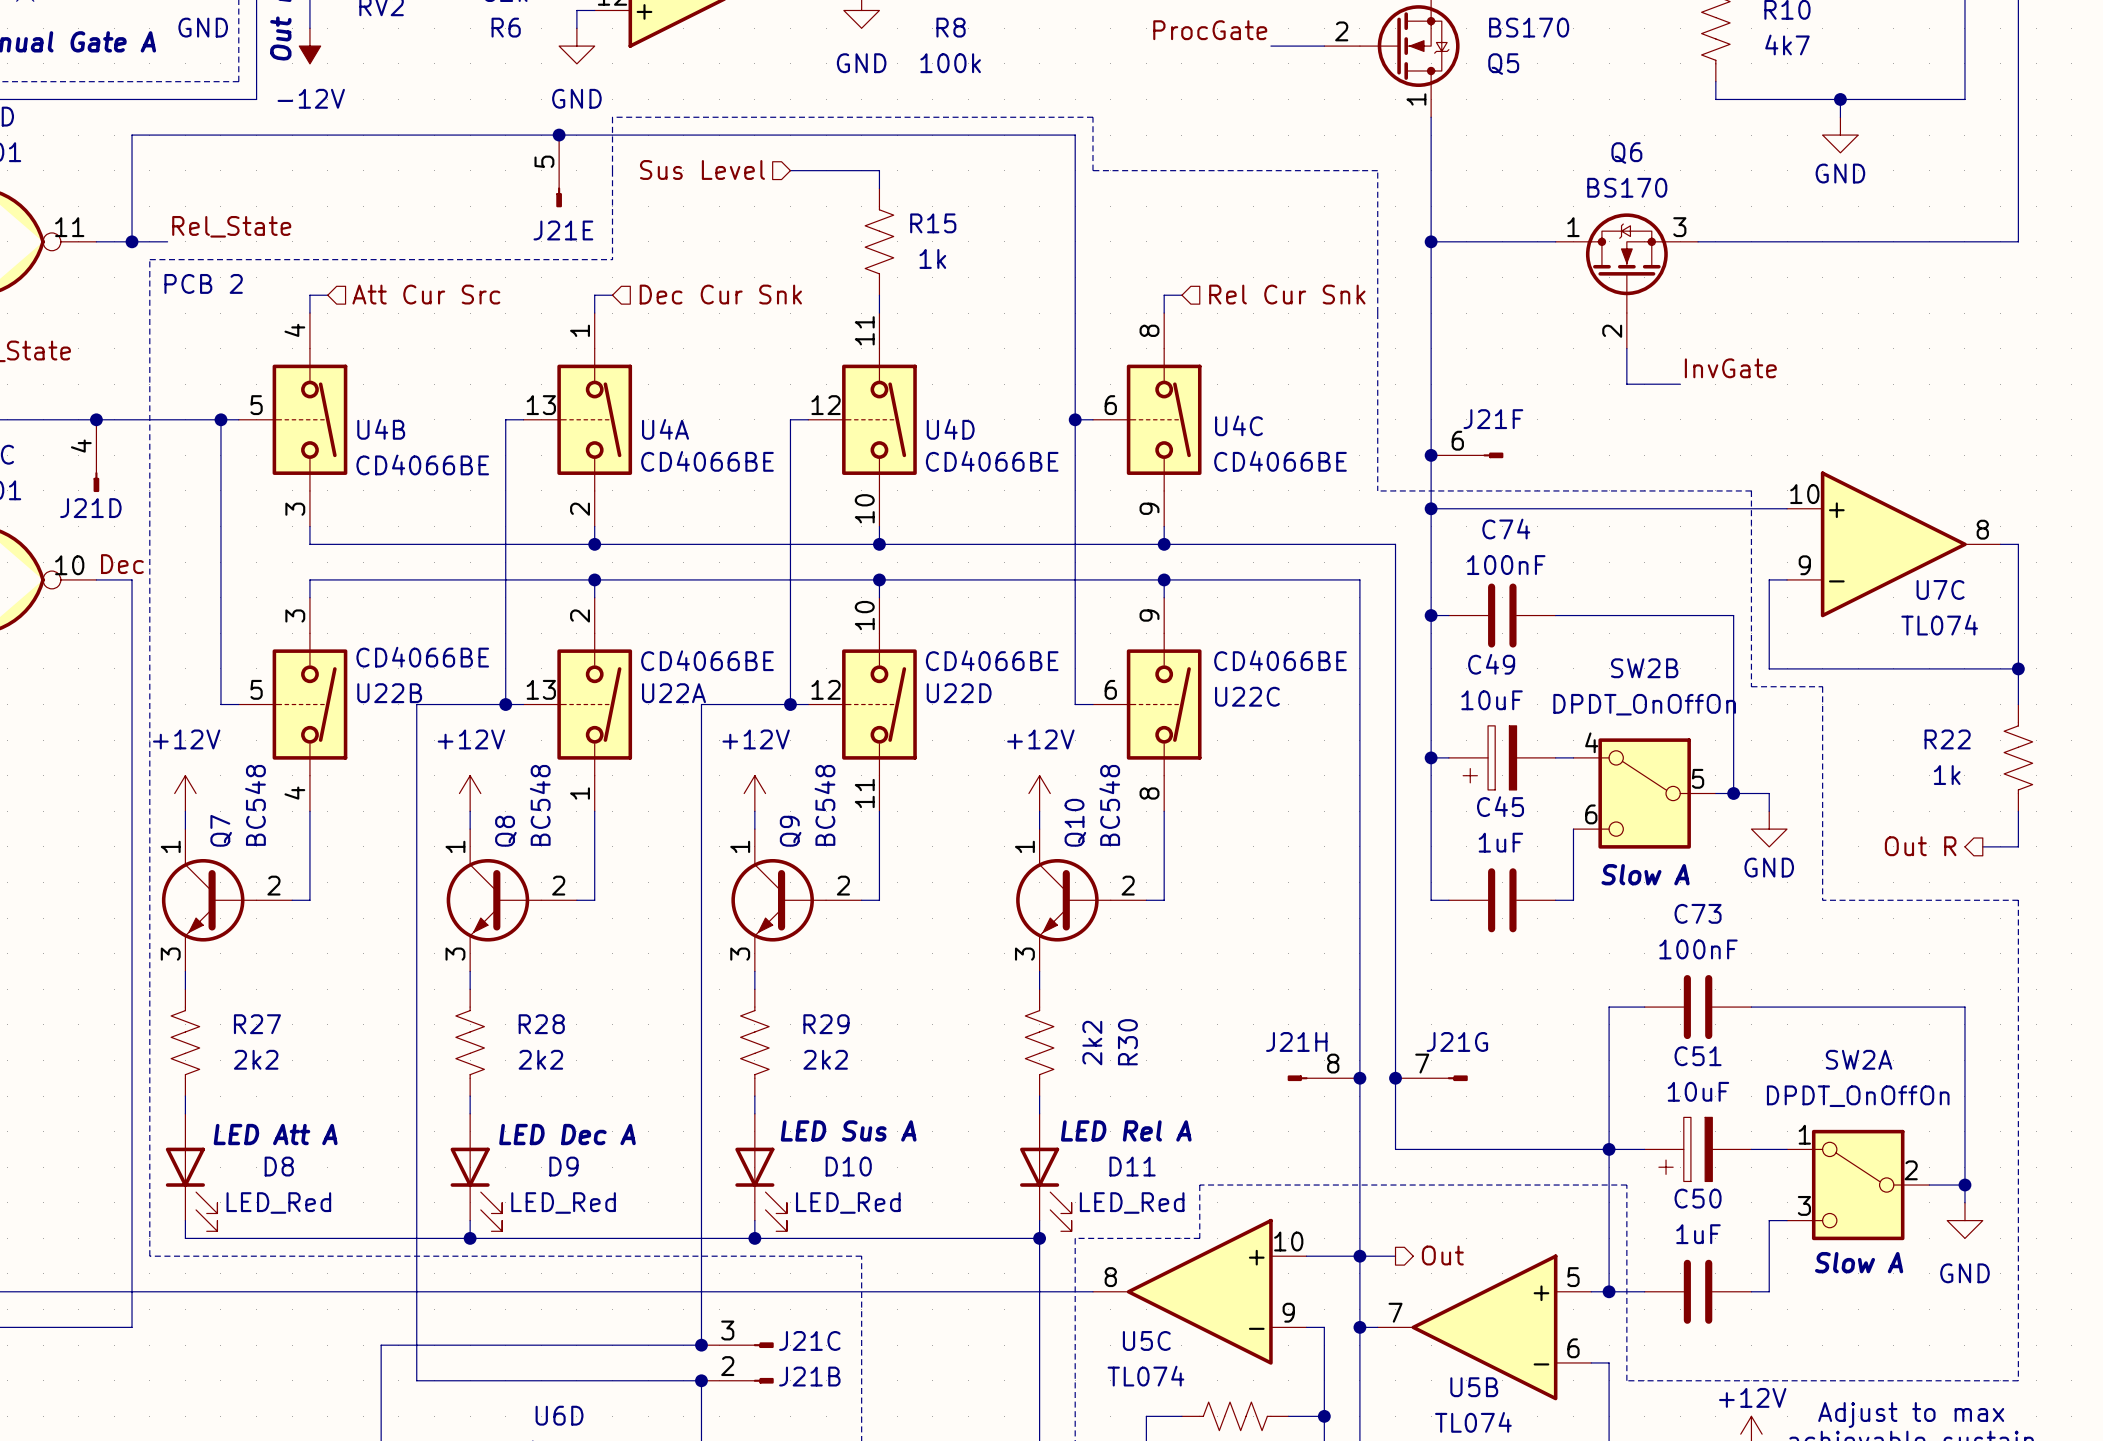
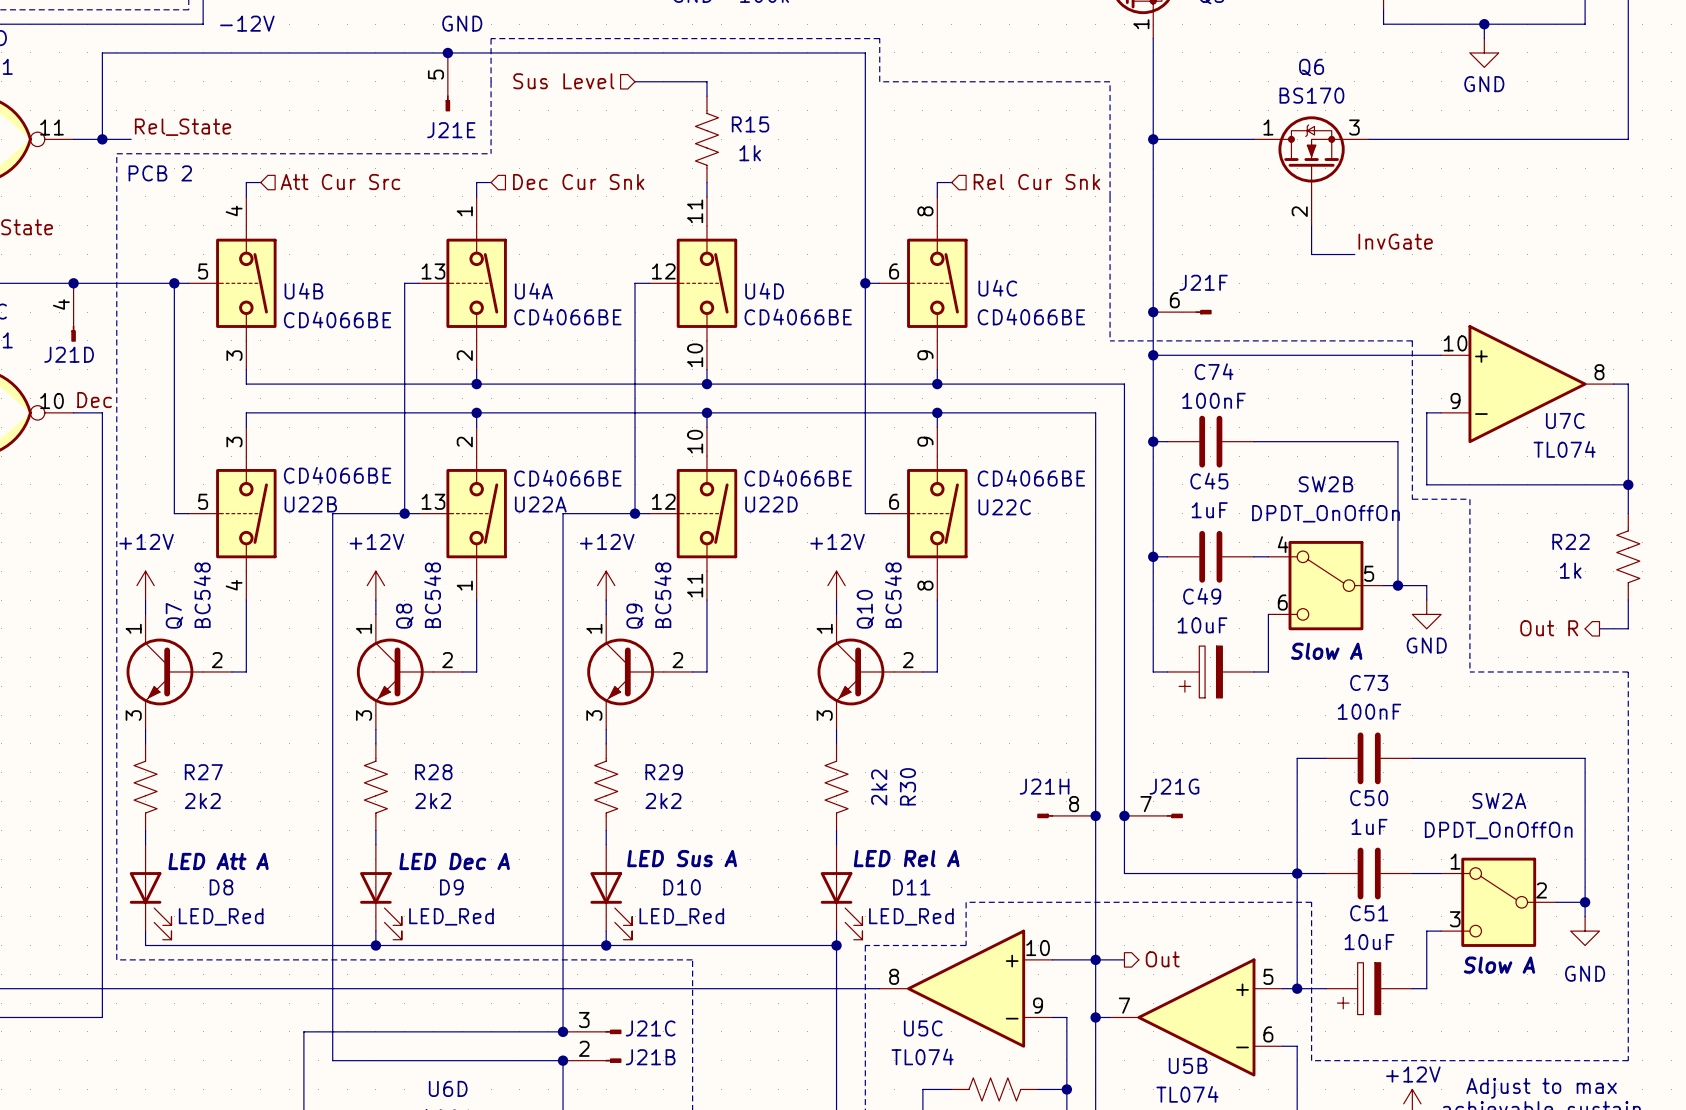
C49 position: (1502, 757) -> (1210, 671)
C45 position: (1502, 900) -> (1210, 556)
C51 position: (1698, 1149) -> (1369, 988)
C50 position: (1698, 1291) -> (1369, 873)

